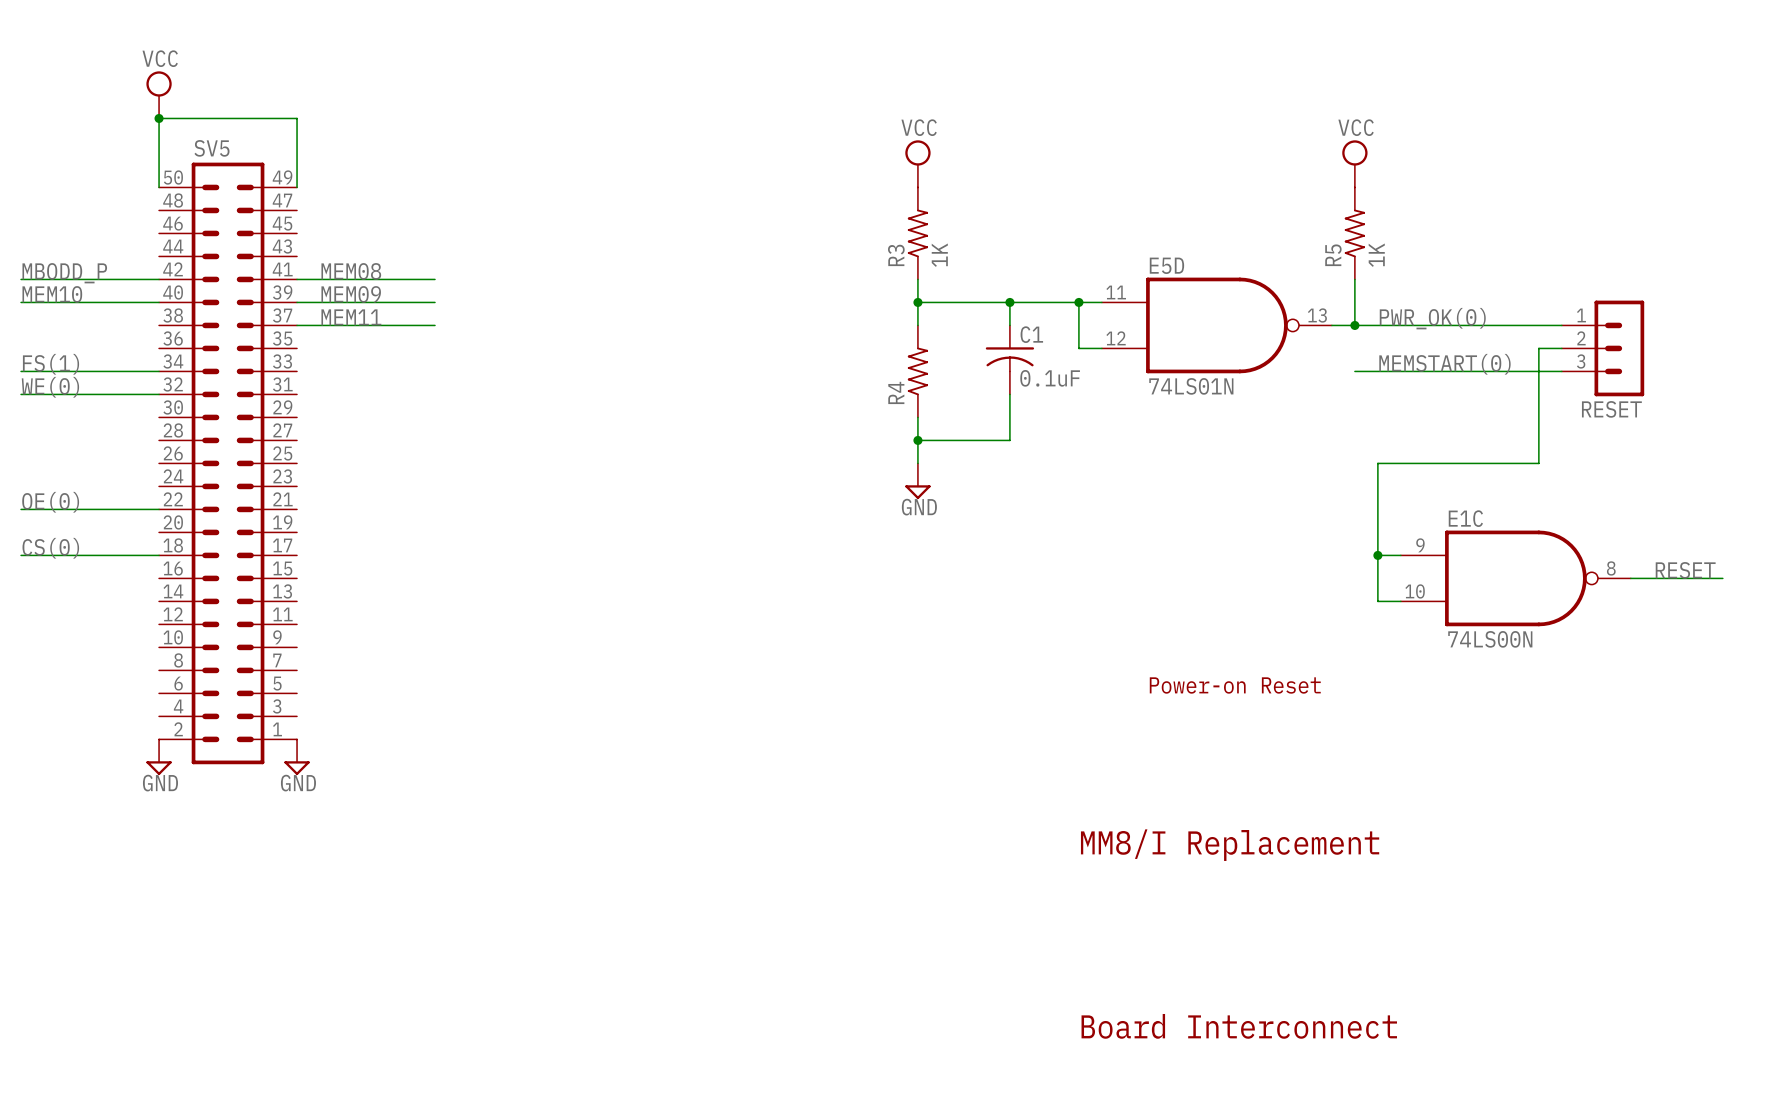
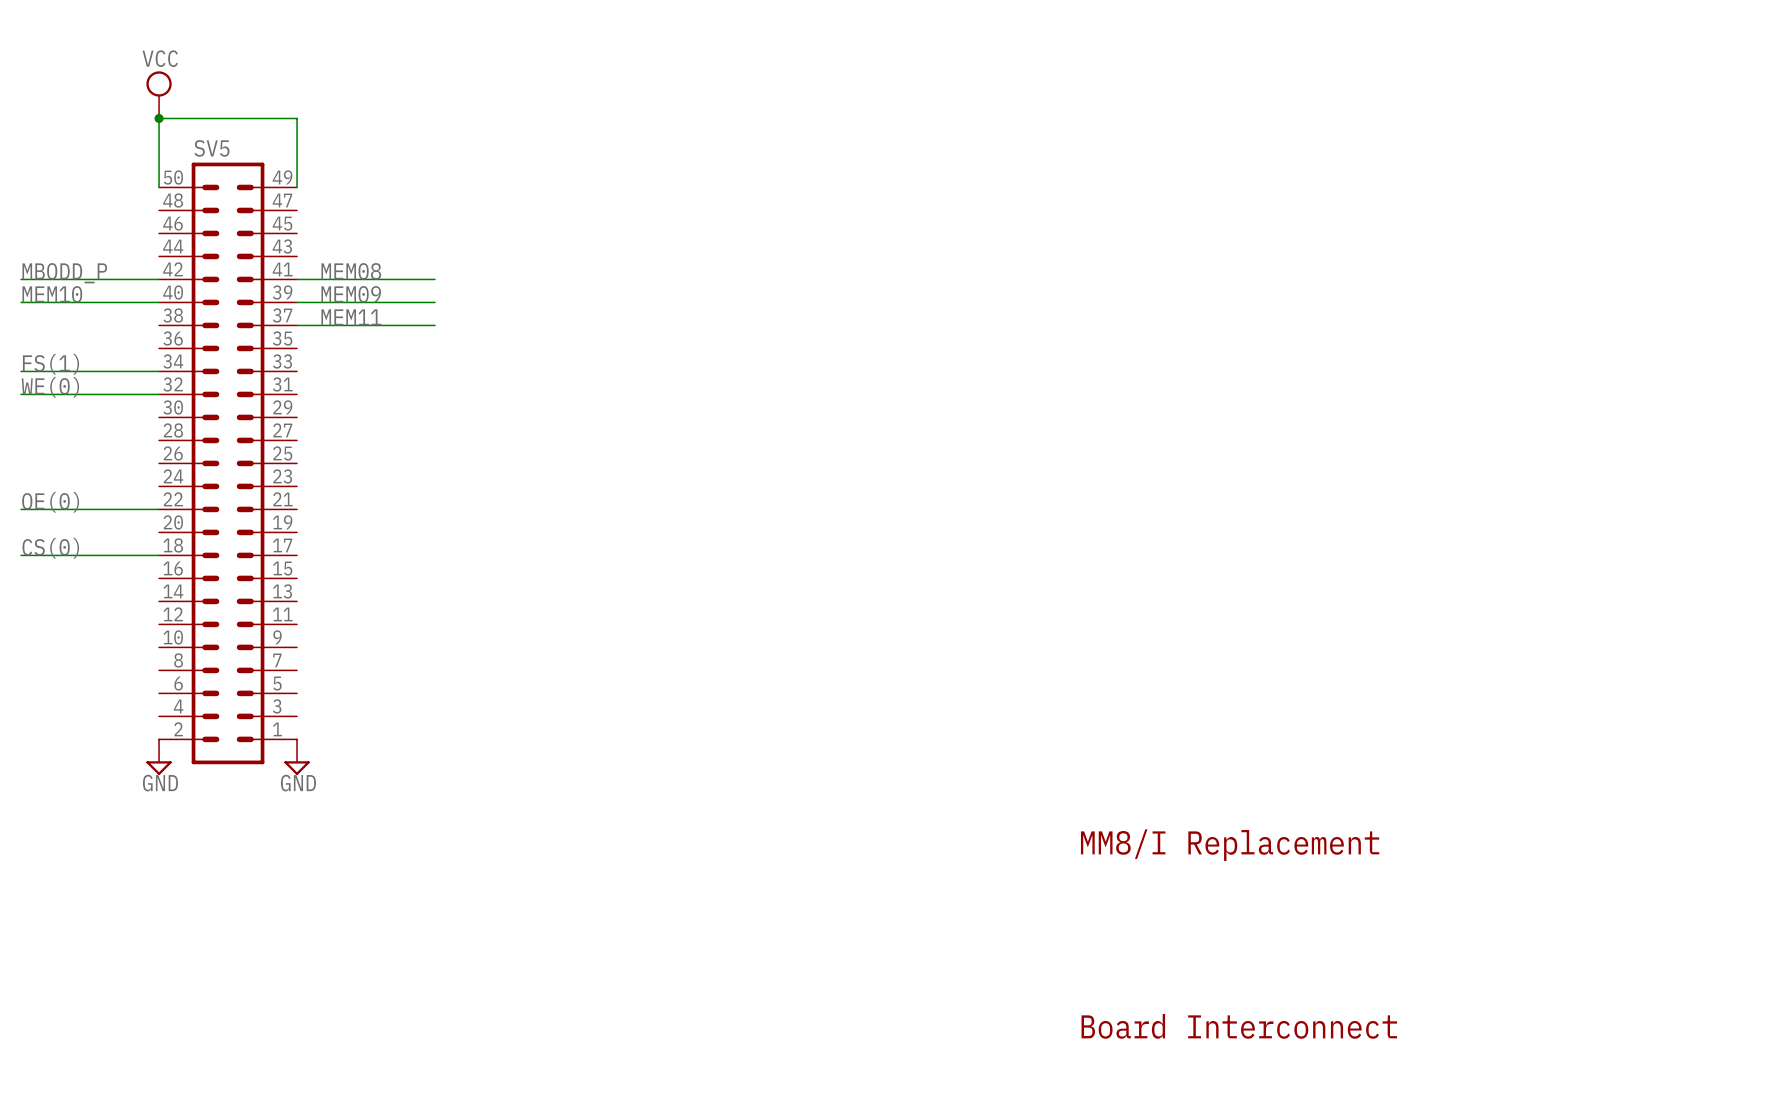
power symbol: VCC (917, 163) -> none
power symbol: VCC (1354, 163) -> none
R3: 1K (917, 233) -> none
R5: 1K (1354, 233) -> none
wire: (917, 279) (917, 325) -> none
wire: (1354, 279) (1354, 325) -> none
wire: (917, 302) (1101, 302) -> none
junction: (917, 302) -> none
wire: (1009, 302) (1009, 325) -> none
junction: (1009, 302) -> none
wire: (1078, 302) (1078, 348) (1101, 348) -> none
junction: (1078, 302) -> none
label: PWR_OK(0) (1432, 318) -> none
E5D: 74LS01N (1216, 325) -> none
wire: (1331, 325) (1561, 325) -> none
junction: (1354, 325) -> none
wire: (1561, 348) (1538, 348) (1538, 463) (1377, 463) (1377, 601) (1400, 601) -> none
RESET: (1603, 348) -> none
C1: 0.1uF (1009, 359) -> none
label: MEMSTART(0) (1444, 364) -> none
R4: (917, 371) -> none
wire: (1354, 371) (1561, 371) -> none
wire: (1009, 394) (1009, 440) (917, 440) -> none
wire: (917, 417) (917, 463) -> none
junction: (917, 440) -> none
power symbol: GND (917, 481) -> none
wire: (1377, 555) (1400, 555) -> none
junction: (1377, 555) -> none
label: RESET (1685, 570) -> none
E1C: 74LS00N (1515, 578) -> none
wire: (1630, 578) (1722, 578) -> none
text: Power-on Reset (1235, 685) -> none

